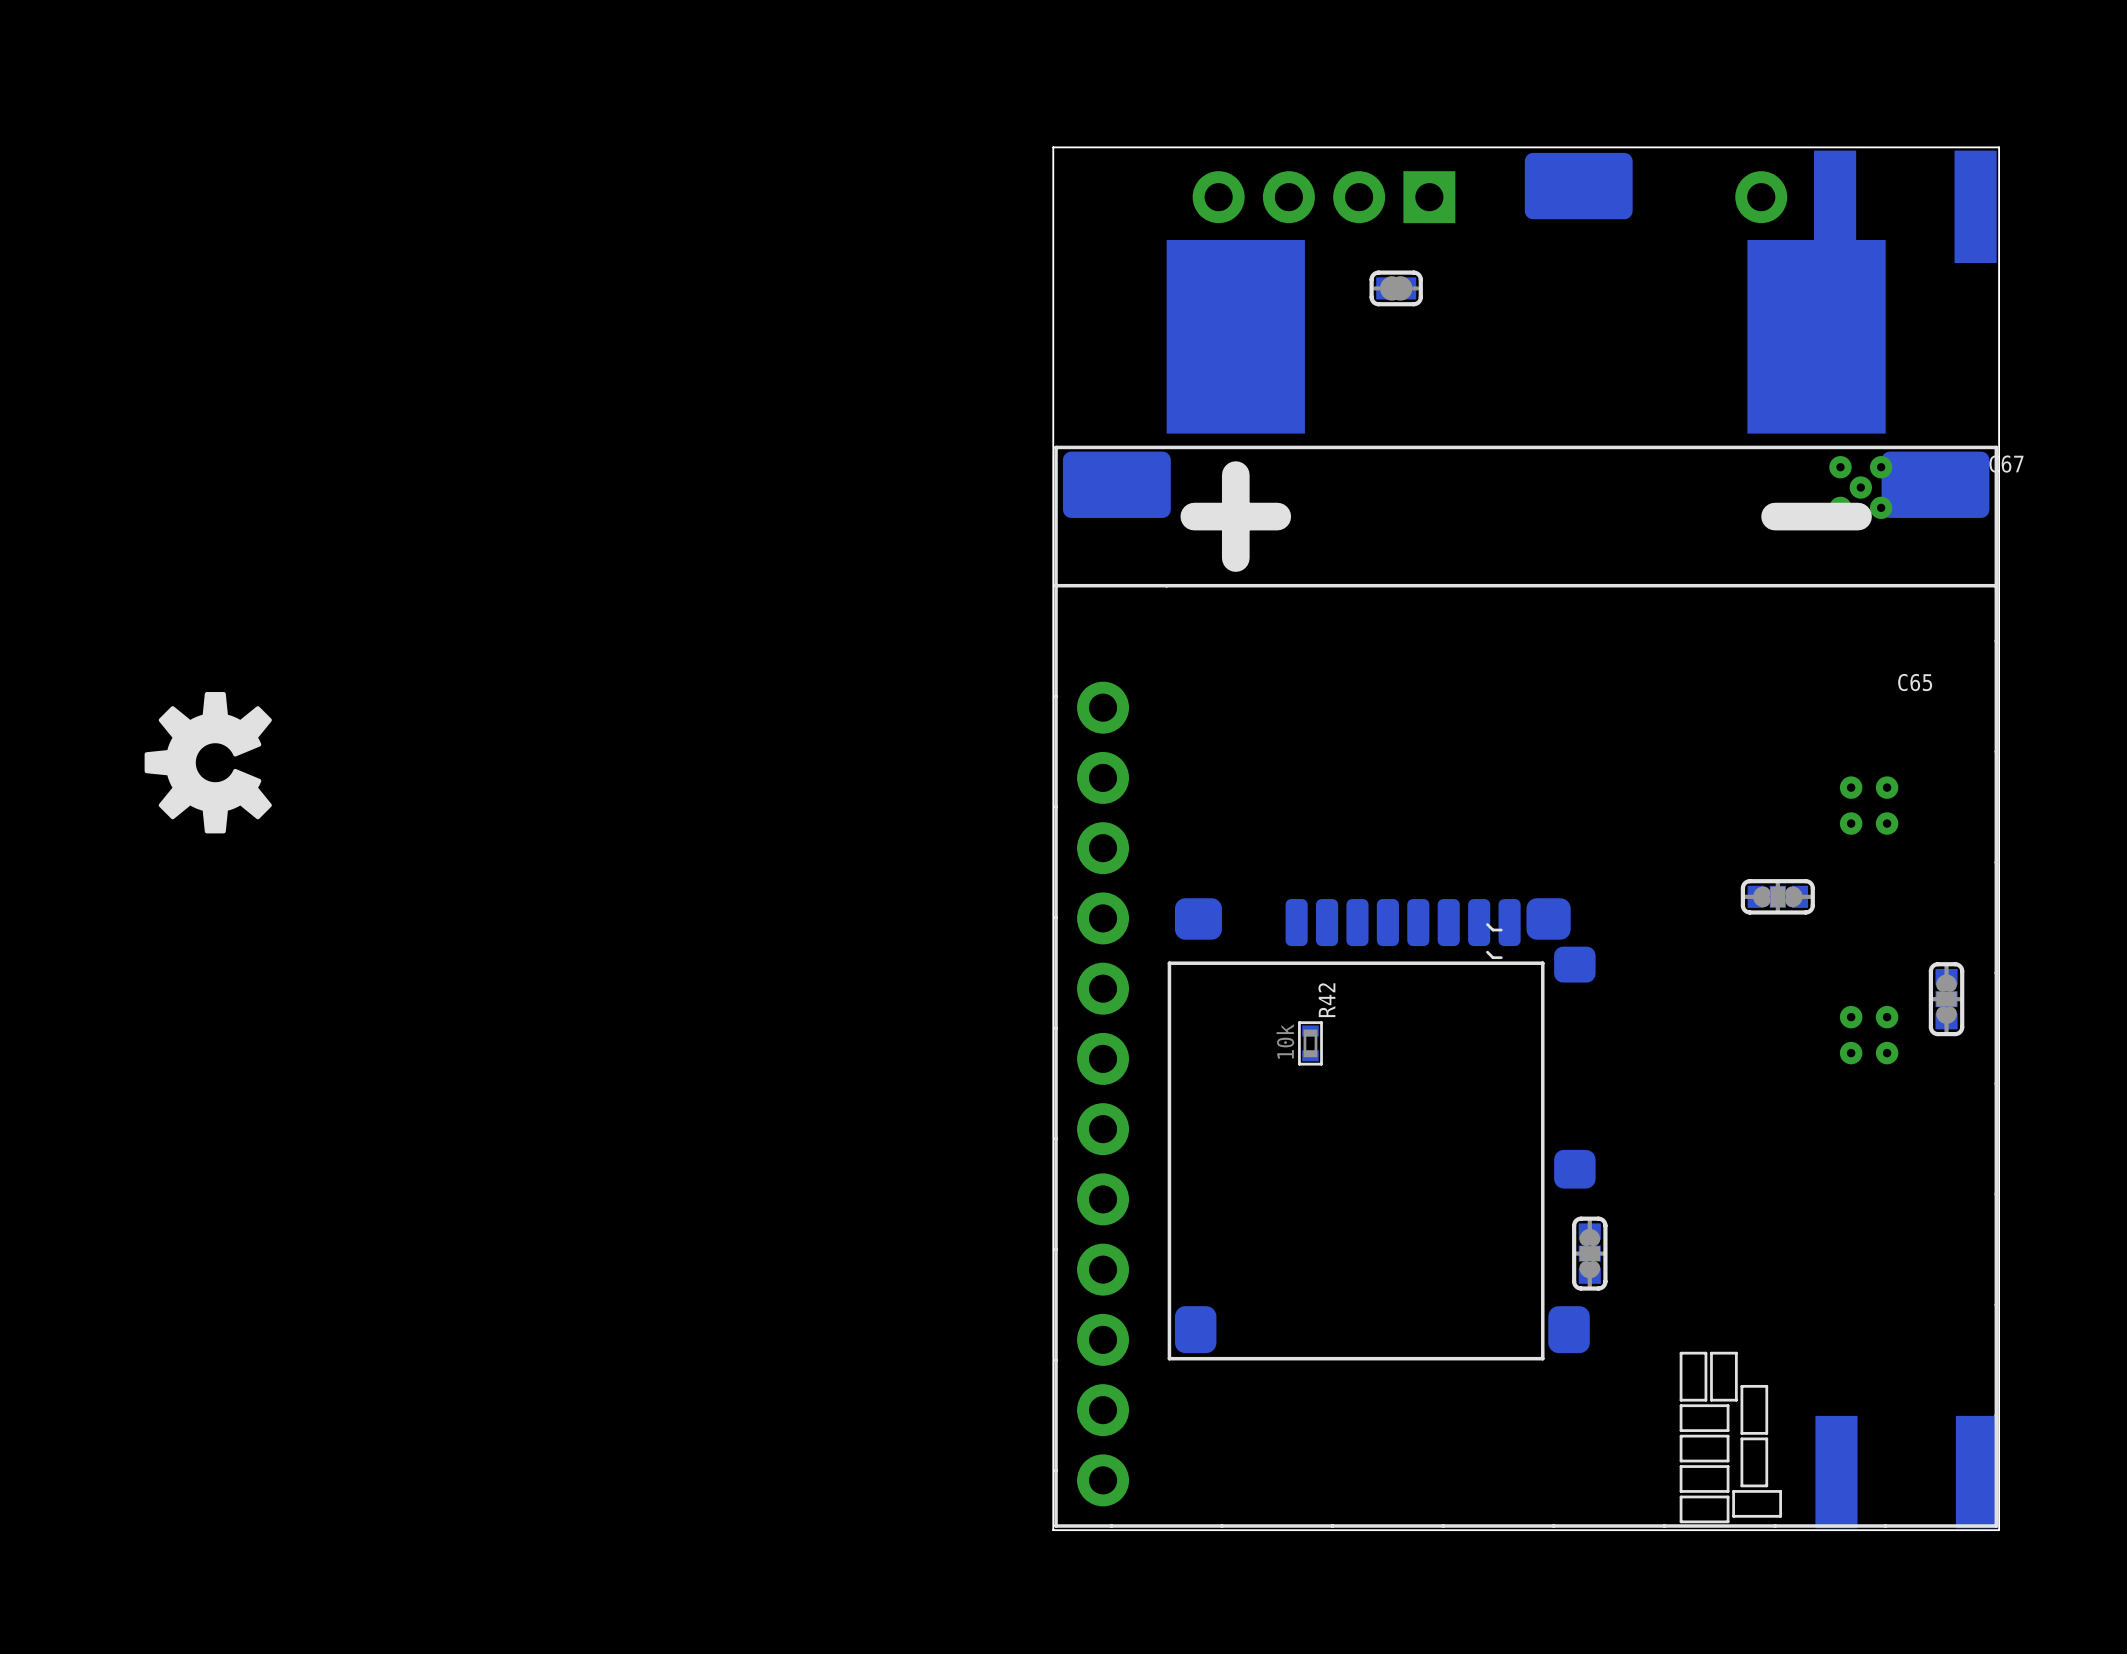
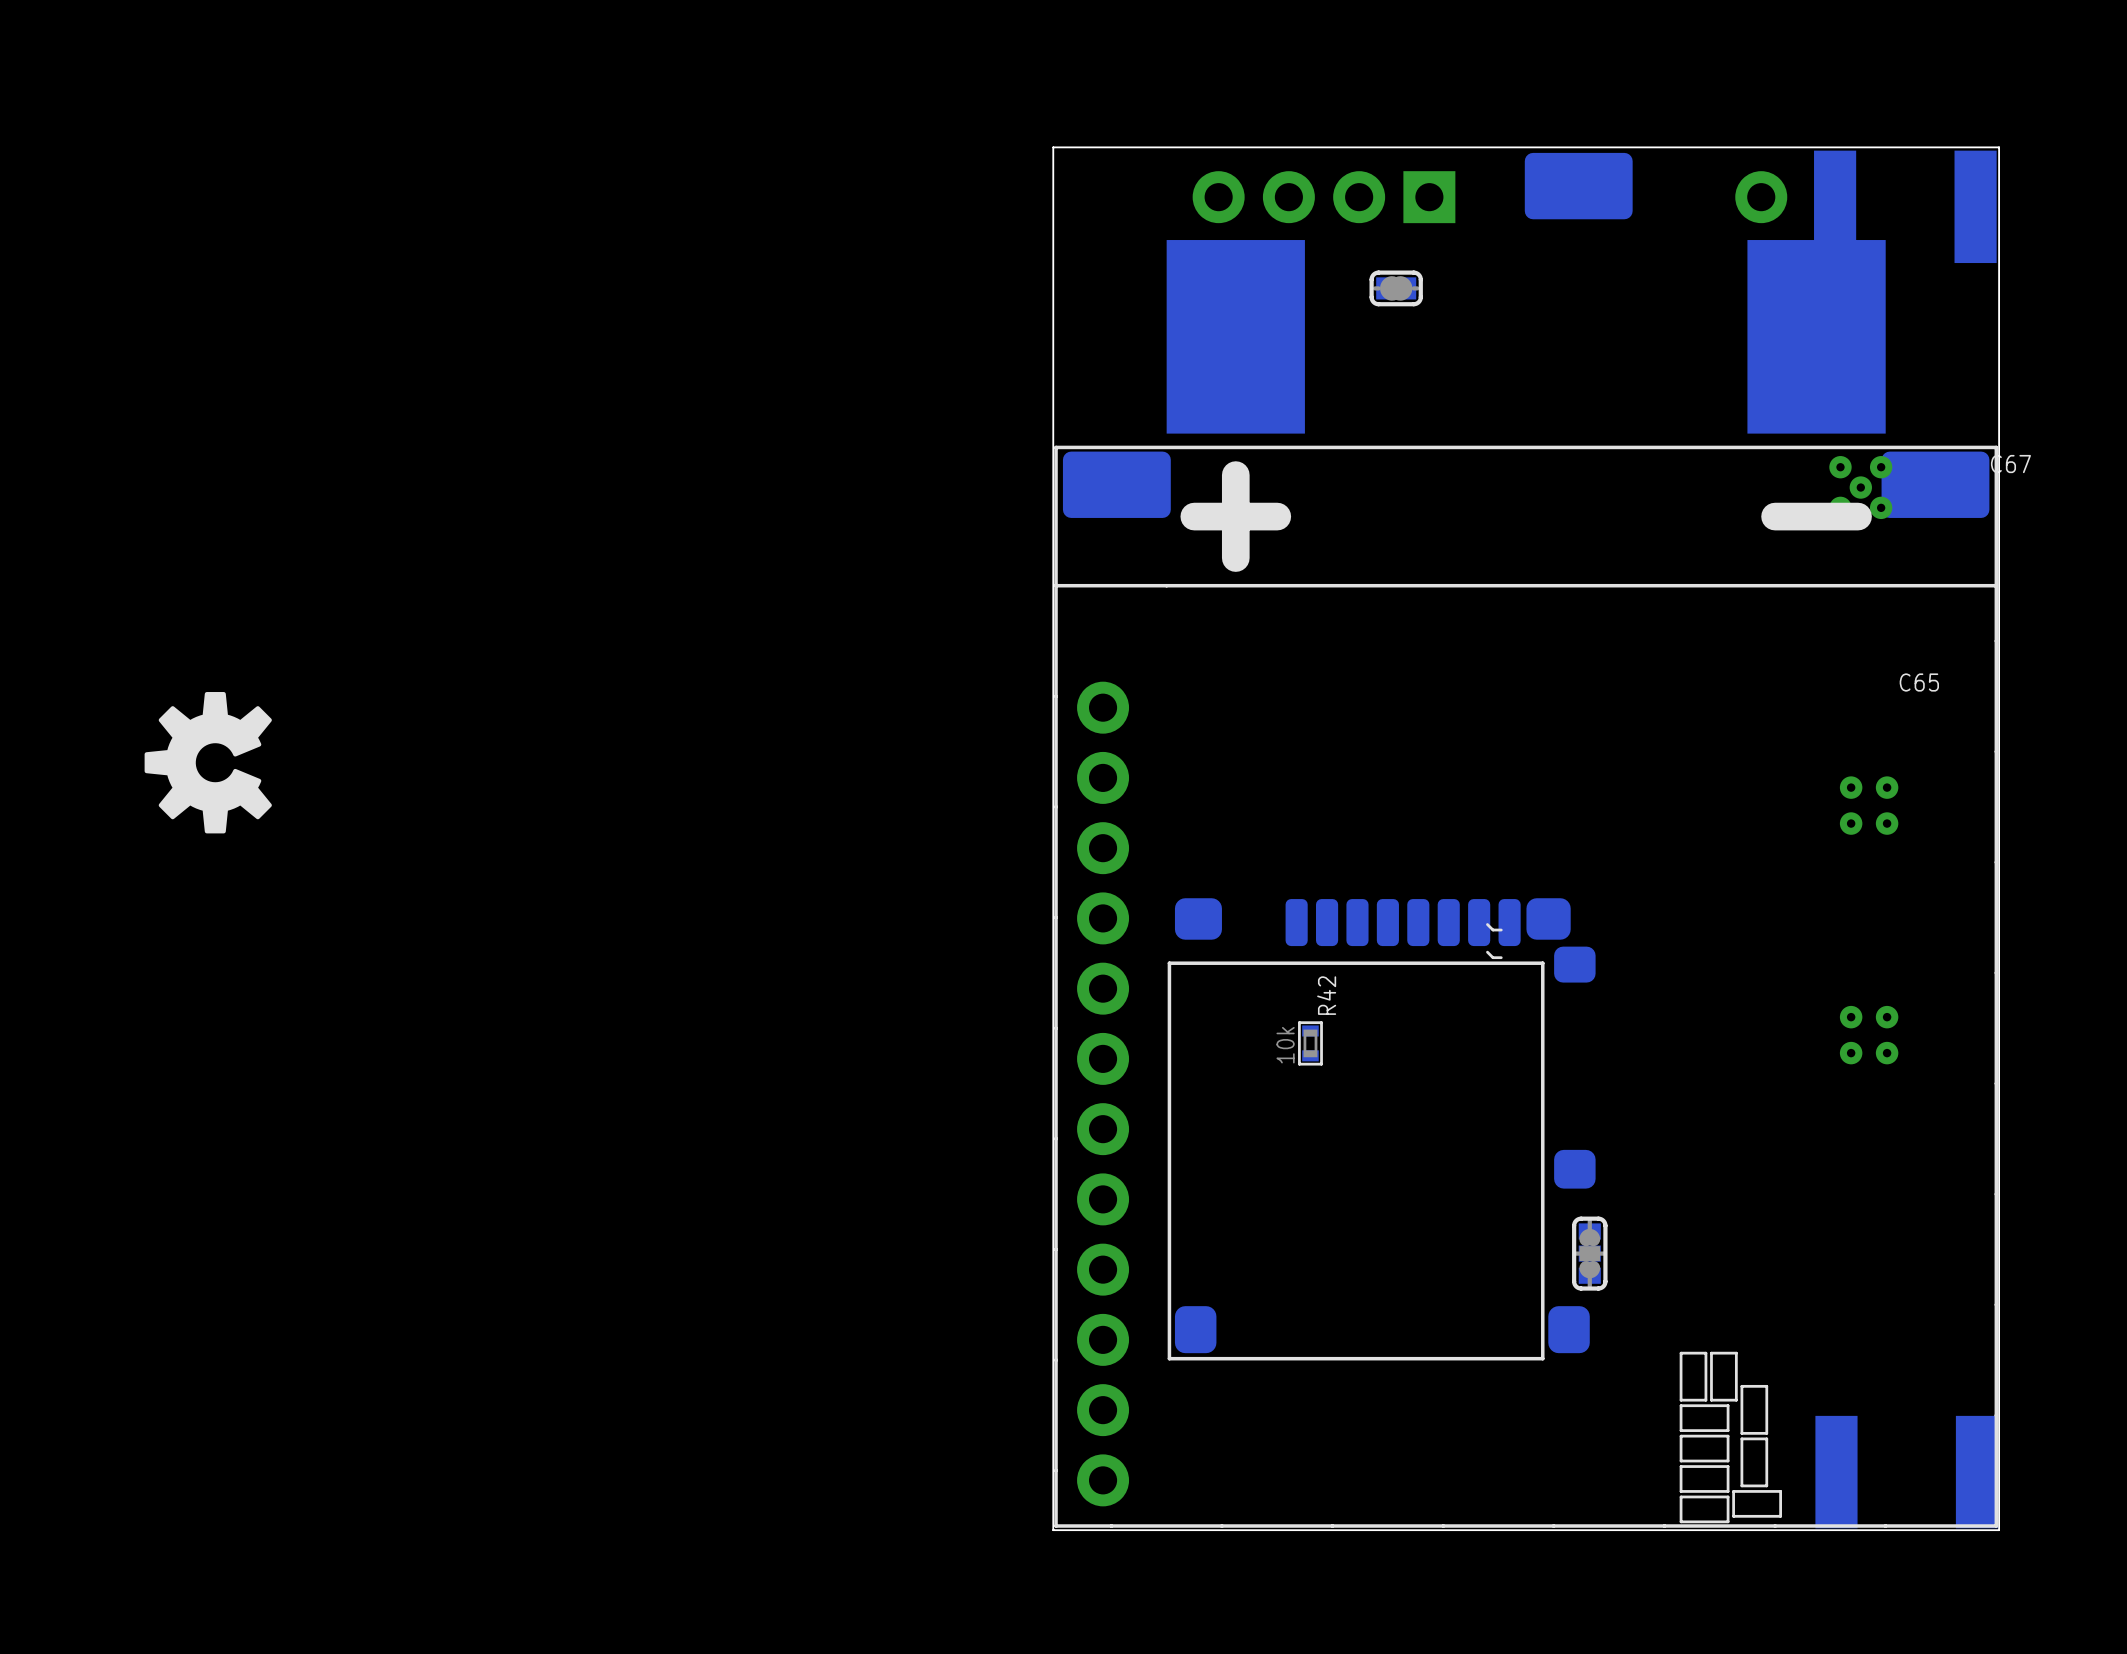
part: (1777, 896) -> none
part: (1946, 999) -> none

